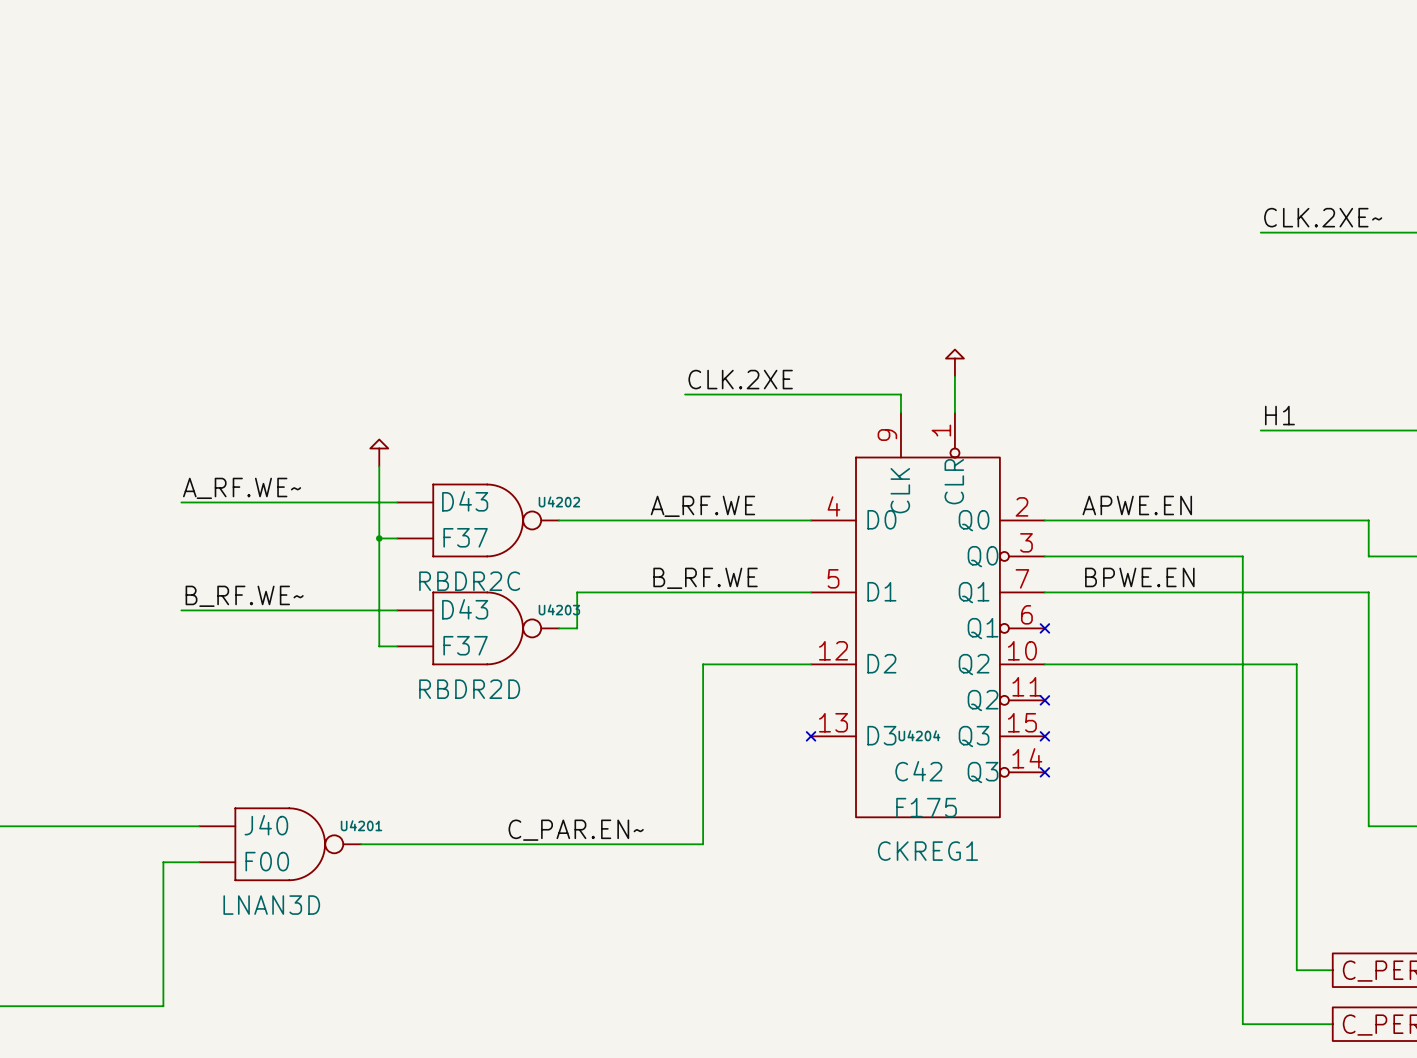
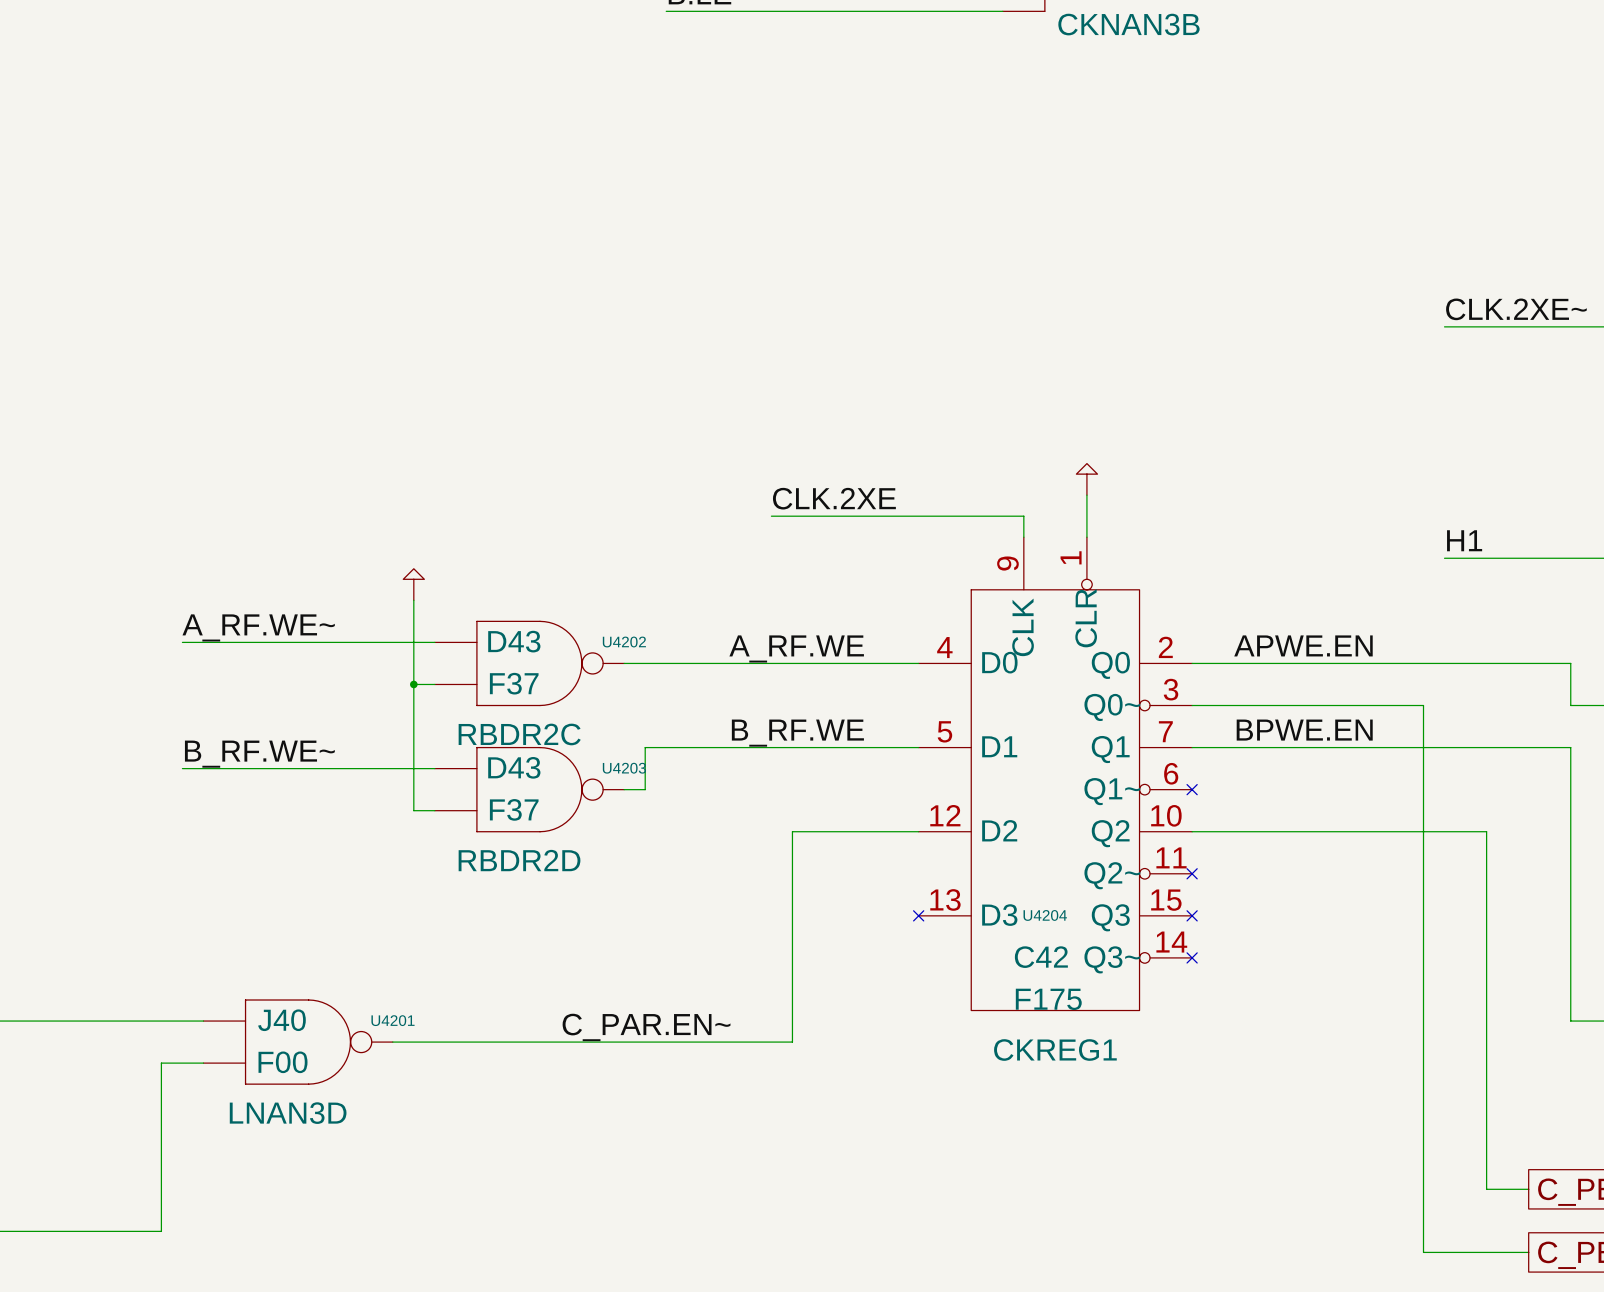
U4204 pin name: Q0 (983, 556) -> Q0~ (1112, 707)
U4204 pin name: Q1 (983, 628) -> Q1~ (1112, 791)
U4204 pin name: Q2 (983, 700) -> Q2~ (1112, 875)
U4204 pin name: Q3 (983, 772) -> Q3~ (1112, 959)

